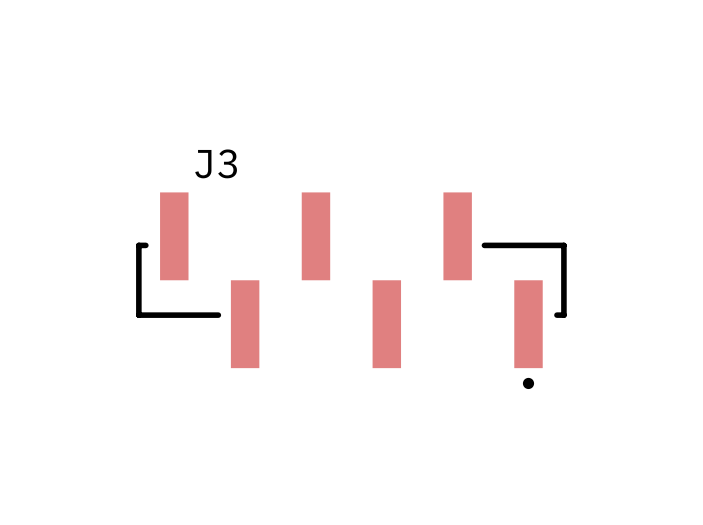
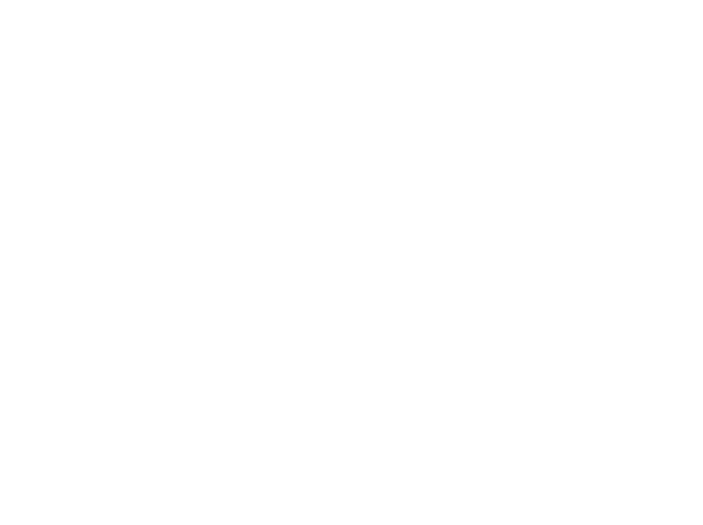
J3: (351, 290) -> none

